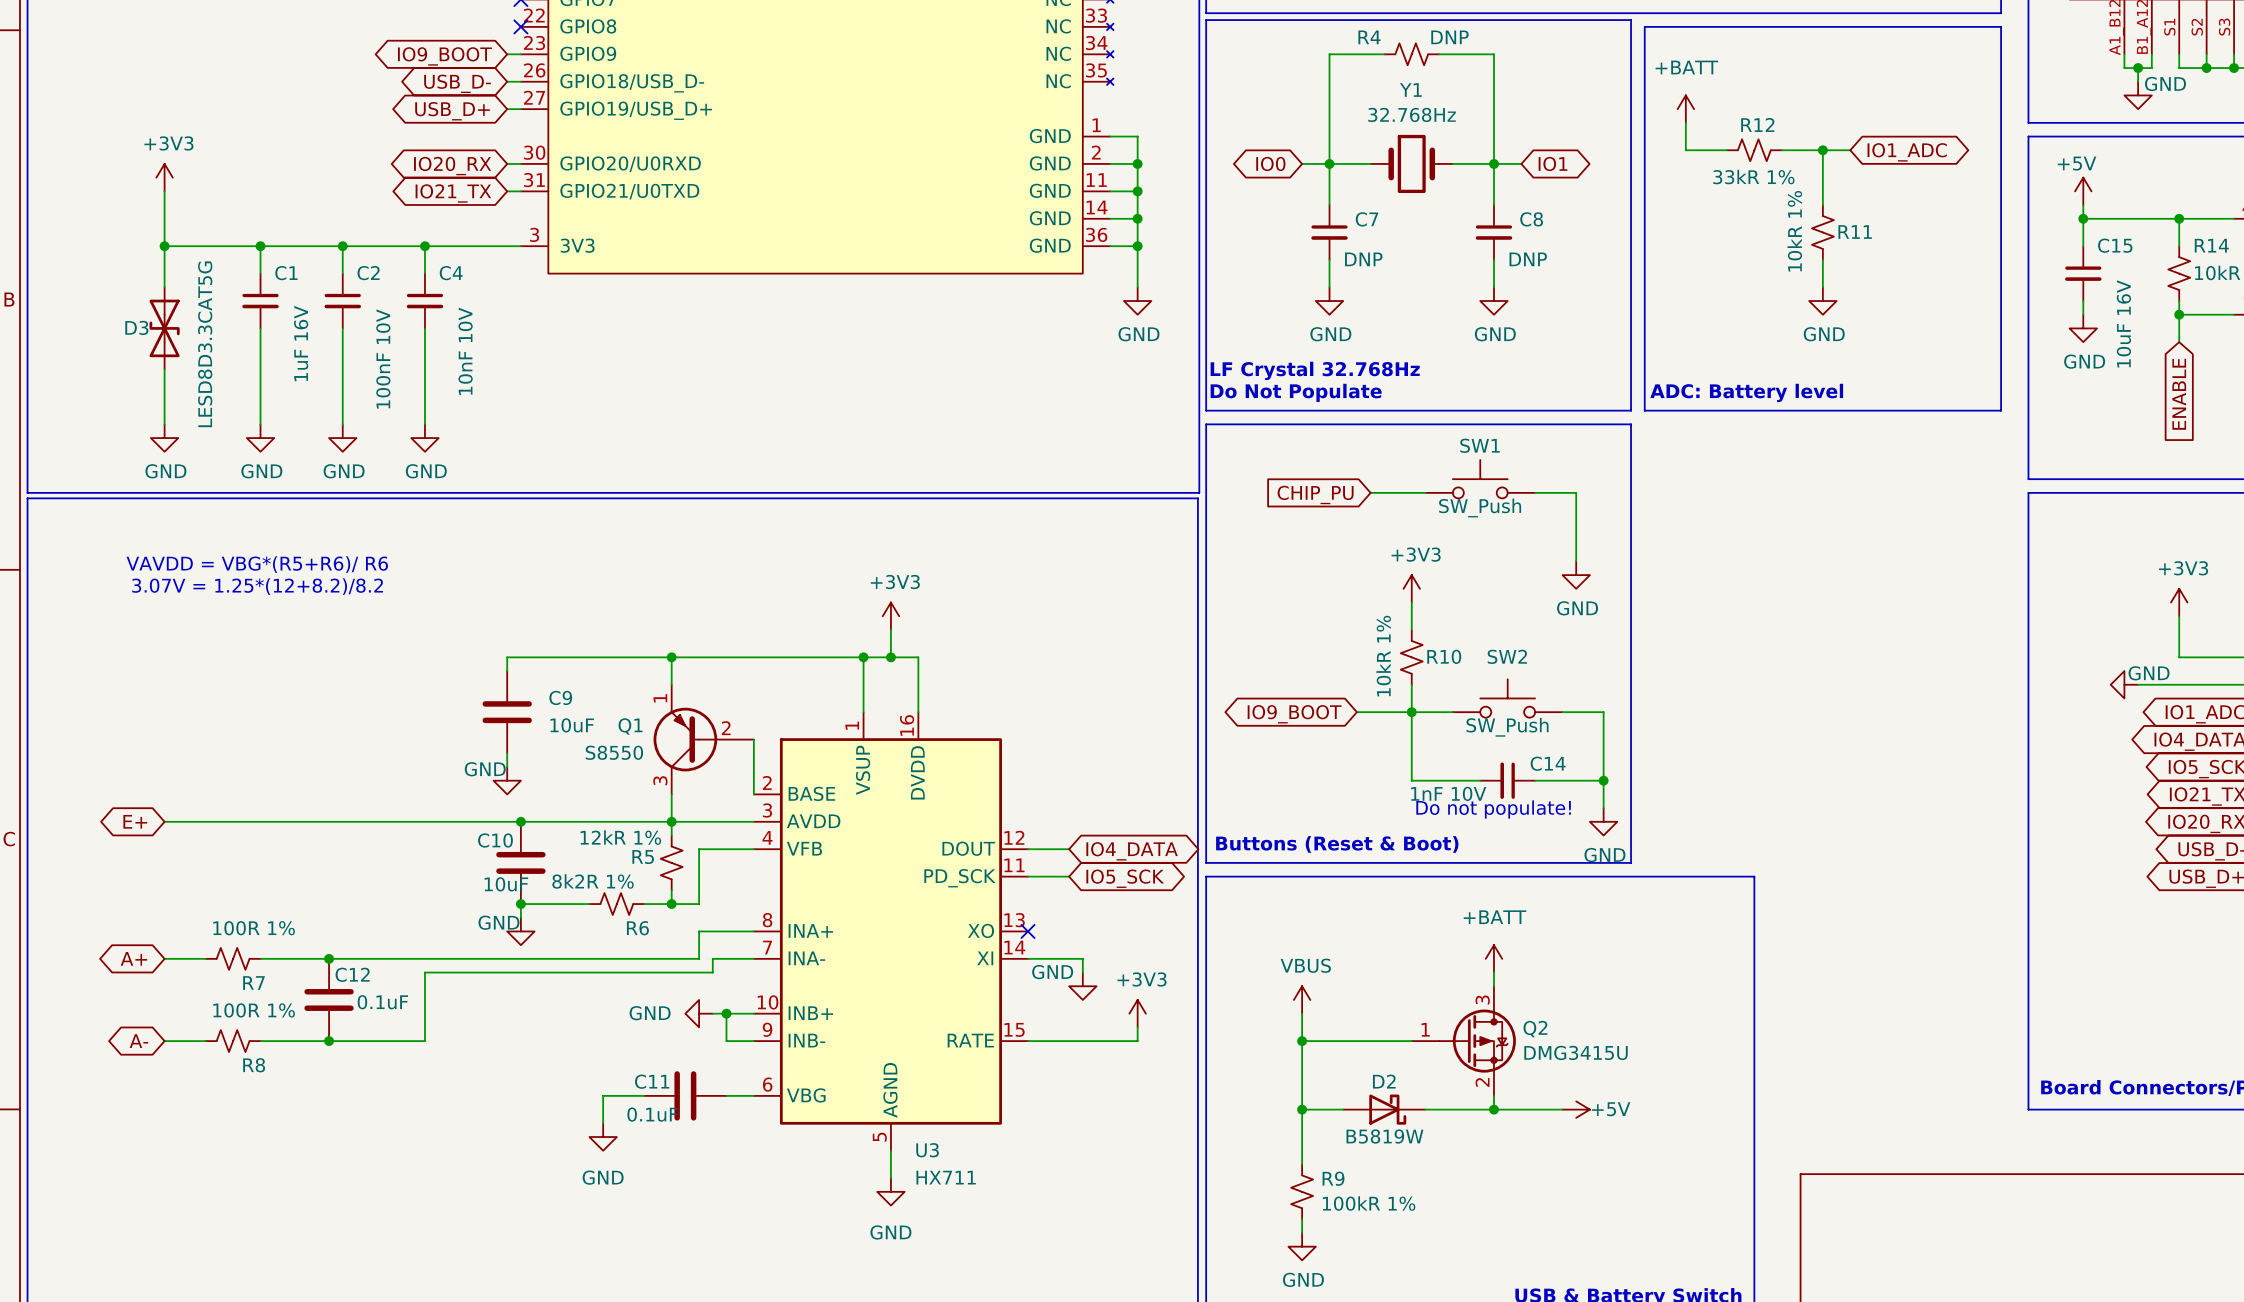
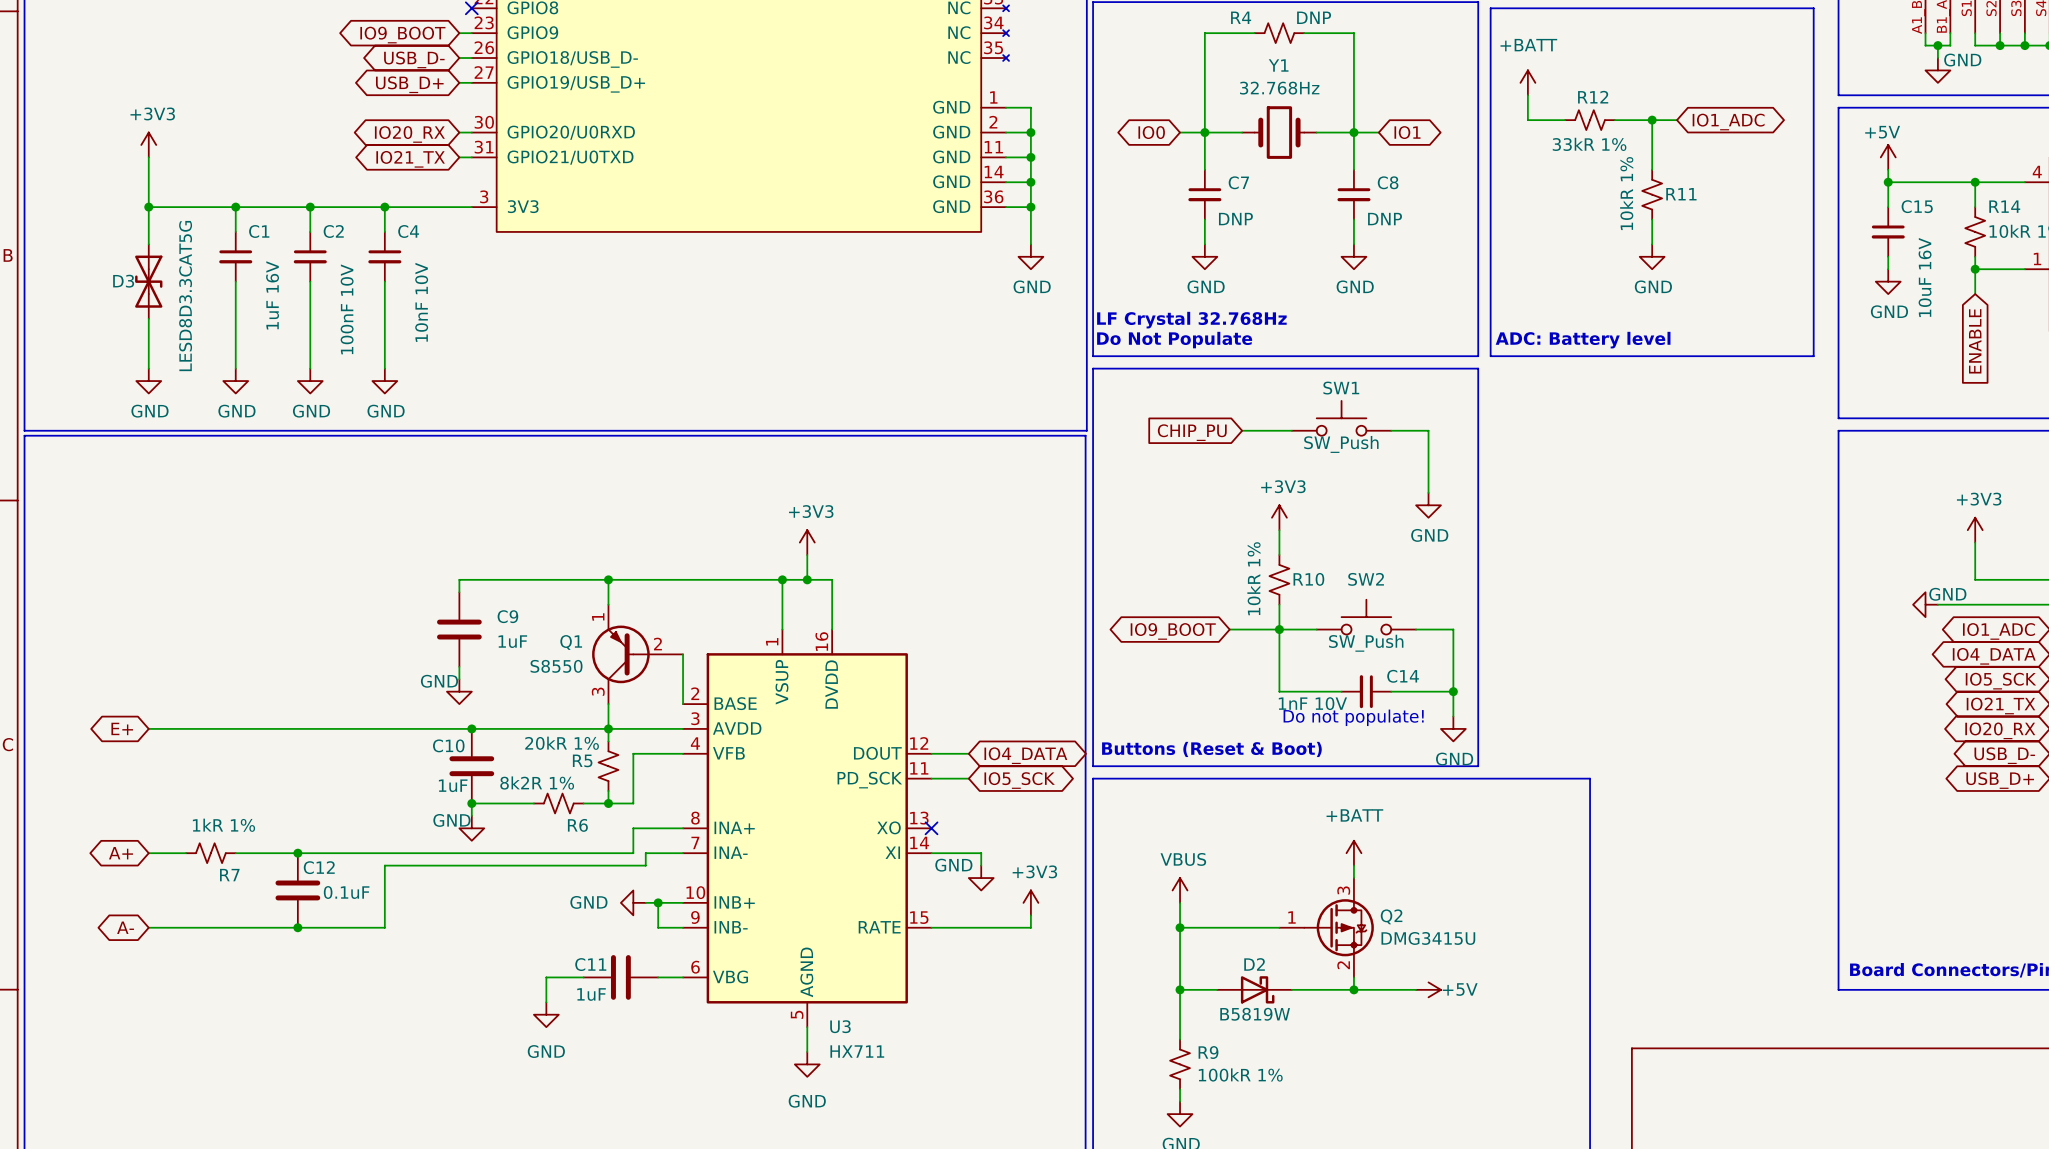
text: VAVDD = VBG*(R5+R6)/ R6 (257, 564) -> none
text: 3.07V = 1.25*(12+8.2)/8.2 (257, 586) -> none
C9 value: 10uF (572, 725) -> 1uF (512, 641)
R5 value: 12kR 1% (620, 837) -> 20kR 1% (562, 743)
C10 value: 10uF (506, 884) -> 1uF (453, 785)
R7 value: 100R 1% (254, 928) -> 1kR 1% (223, 825)
R8: 100R 1% (233, 1041) -> none
C11 value: 0.1uF (652, 1114) -> 1uF (591, 994)

